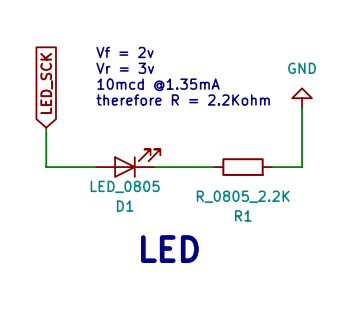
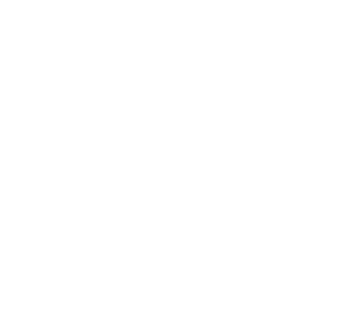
text: Vf = 2v (125, 52) -> none
text: Vr = 3v (125, 68) -> none
global label: LED_SCK (46, 83) -> none
text: 10mcd @1.35mA (158, 84) -> none
power symbol: GND (302, 98) -> none
text: therefore R = 2.2Kohm (183, 99) -> none
wire: (302, 108) (302, 167) (272, 167) -> none
wire: (46, 127) (46, 167) (95, 167) -> none
D1: LED_0805 (127, 163) -> none
wire: (154, 167) (213, 167) -> none
R1: R_0805_2.2K (243, 167) -> none
text: LED (169, 249) -> none

